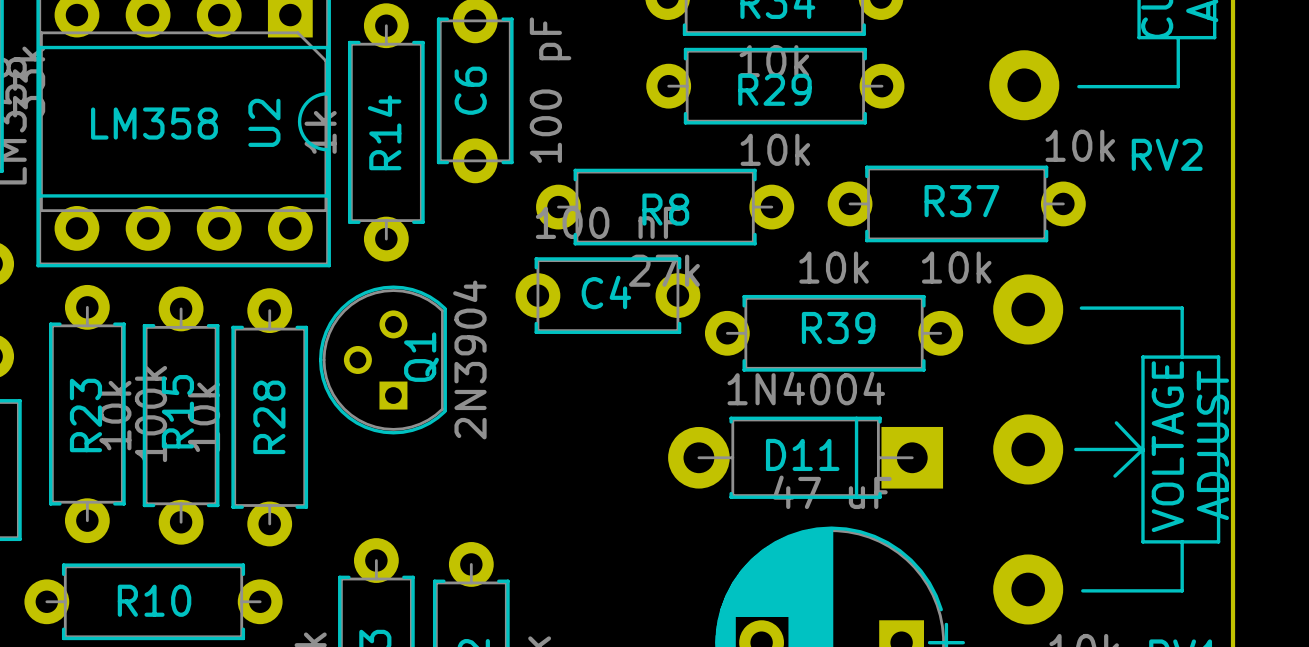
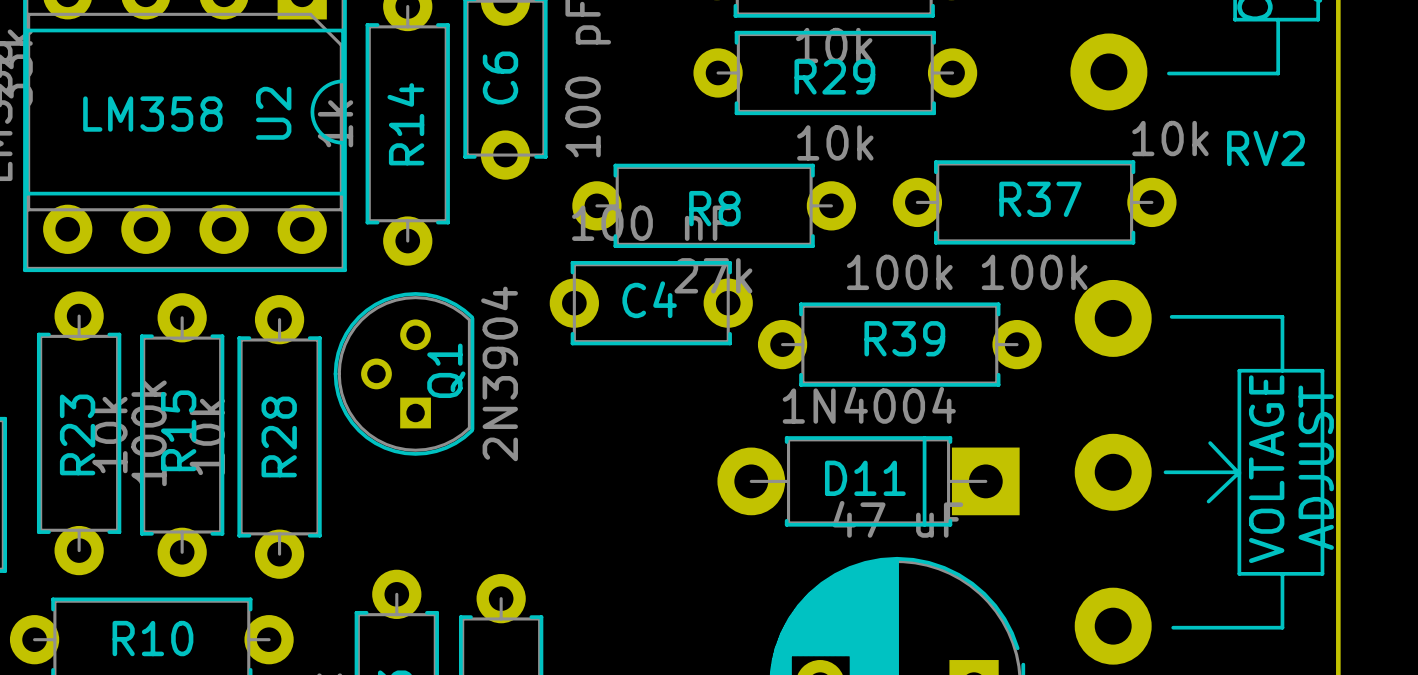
R39 value: 10k (834, 267) -> 100k (899, 272)
R37 value: 10k (956, 267) -> 100k (1034, 272)

